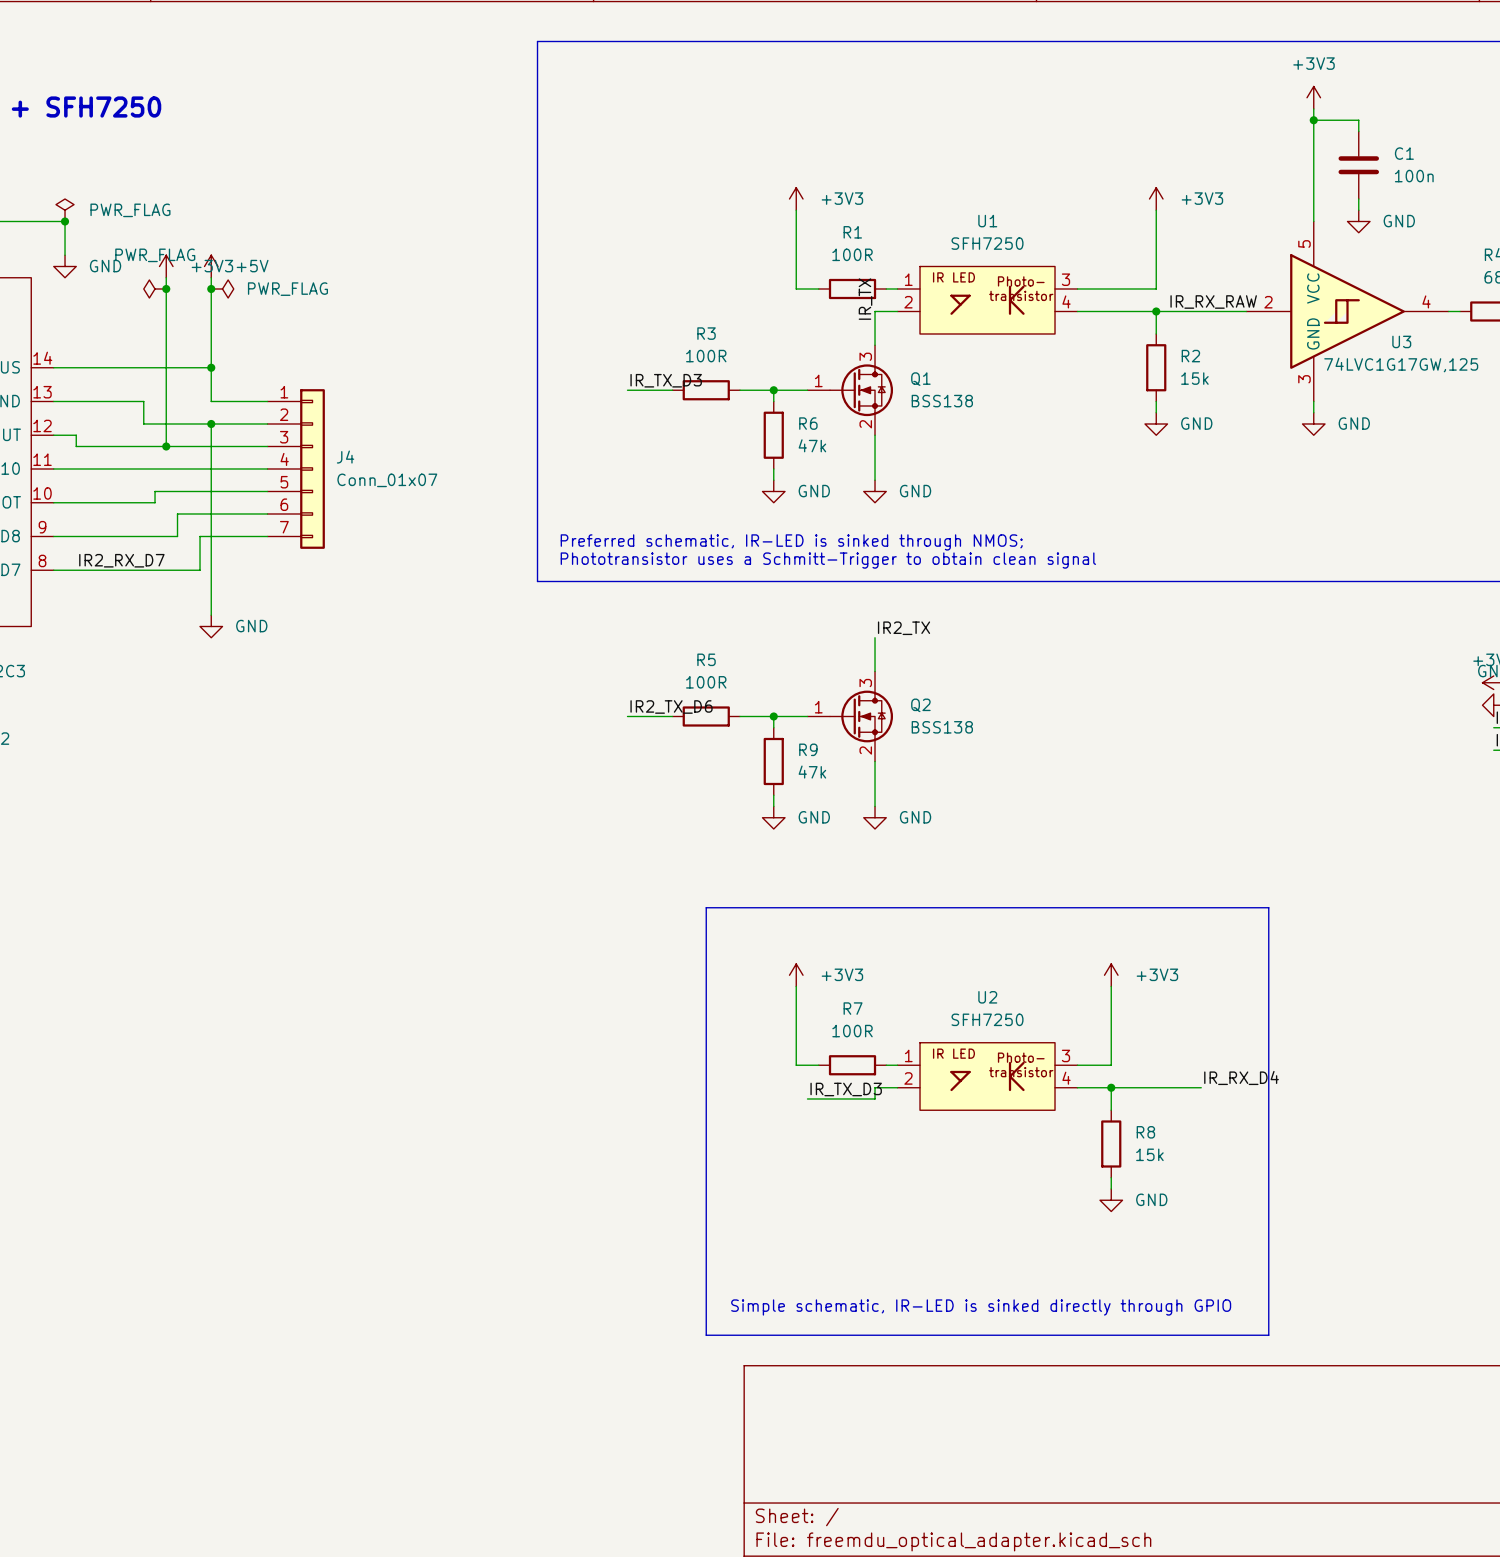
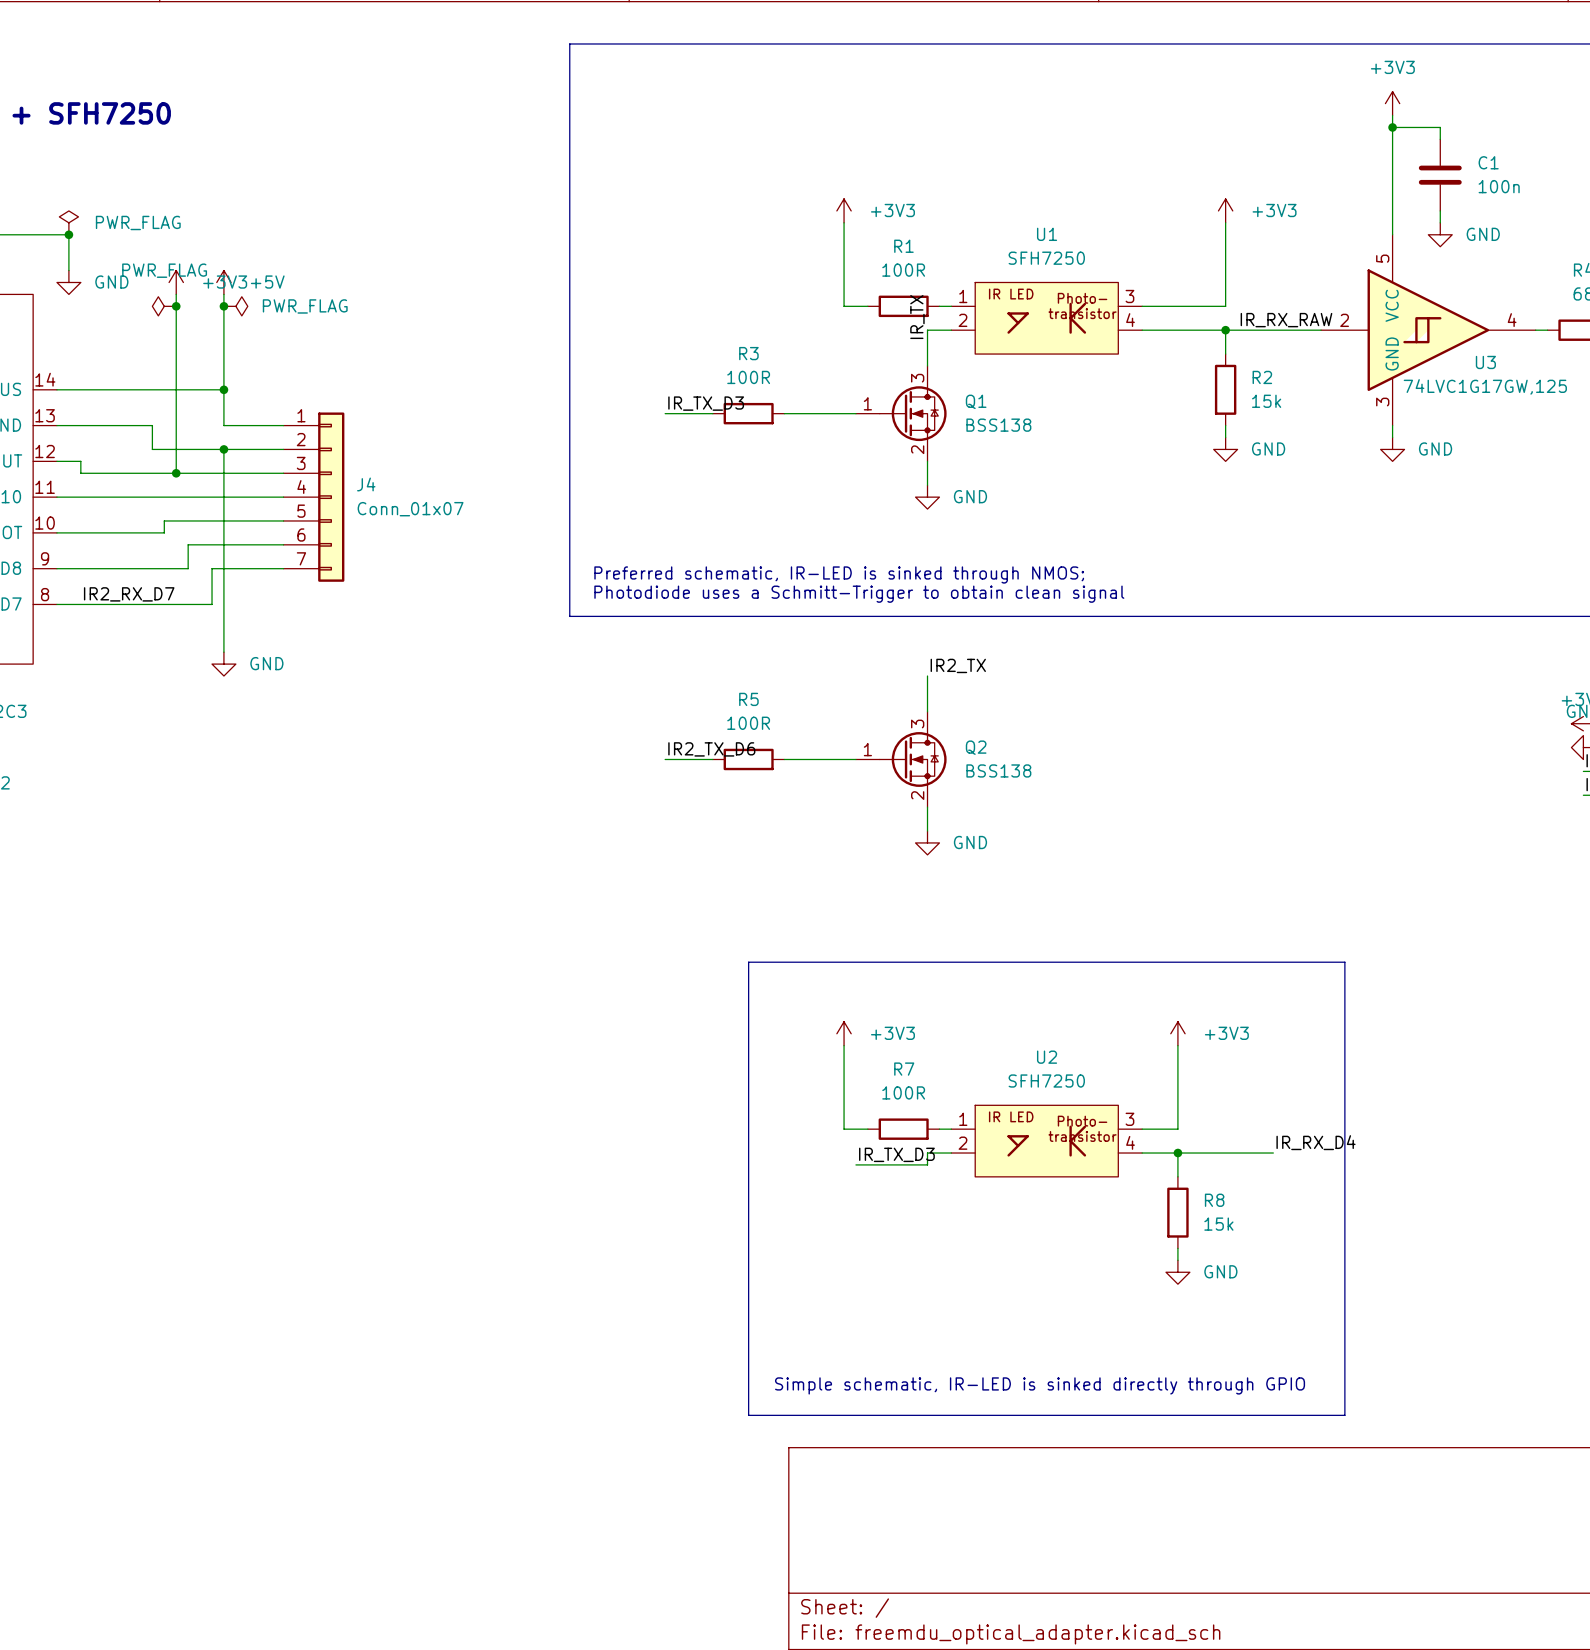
wire: (773, 390) (773, 401) -> none
junction: (773, 390) -> none
R6: 47k (773, 435) -> none
wire: (773, 468) (773, 480) -> none
power symbol: GND (773, 491) -> none
power symbol position: GND (875, 491) -> GND (927, 497)
text: Phototransistor uses a Schmitt-Trigger to obtain clean signal (828, 560) -> Photodiode uses a Schmitt-Trigger to obtain clean signal (859, 594)
wire: (773, 716) (773, 727) -> none
junction: (773, 716) -> none
R9: 47k (773, 761) -> none
wire: (773, 795) (773, 806) -> none
power symbol: GND (773, 817) -> none
power symbol position: GND (875, 817) -> GND (927, 842)

